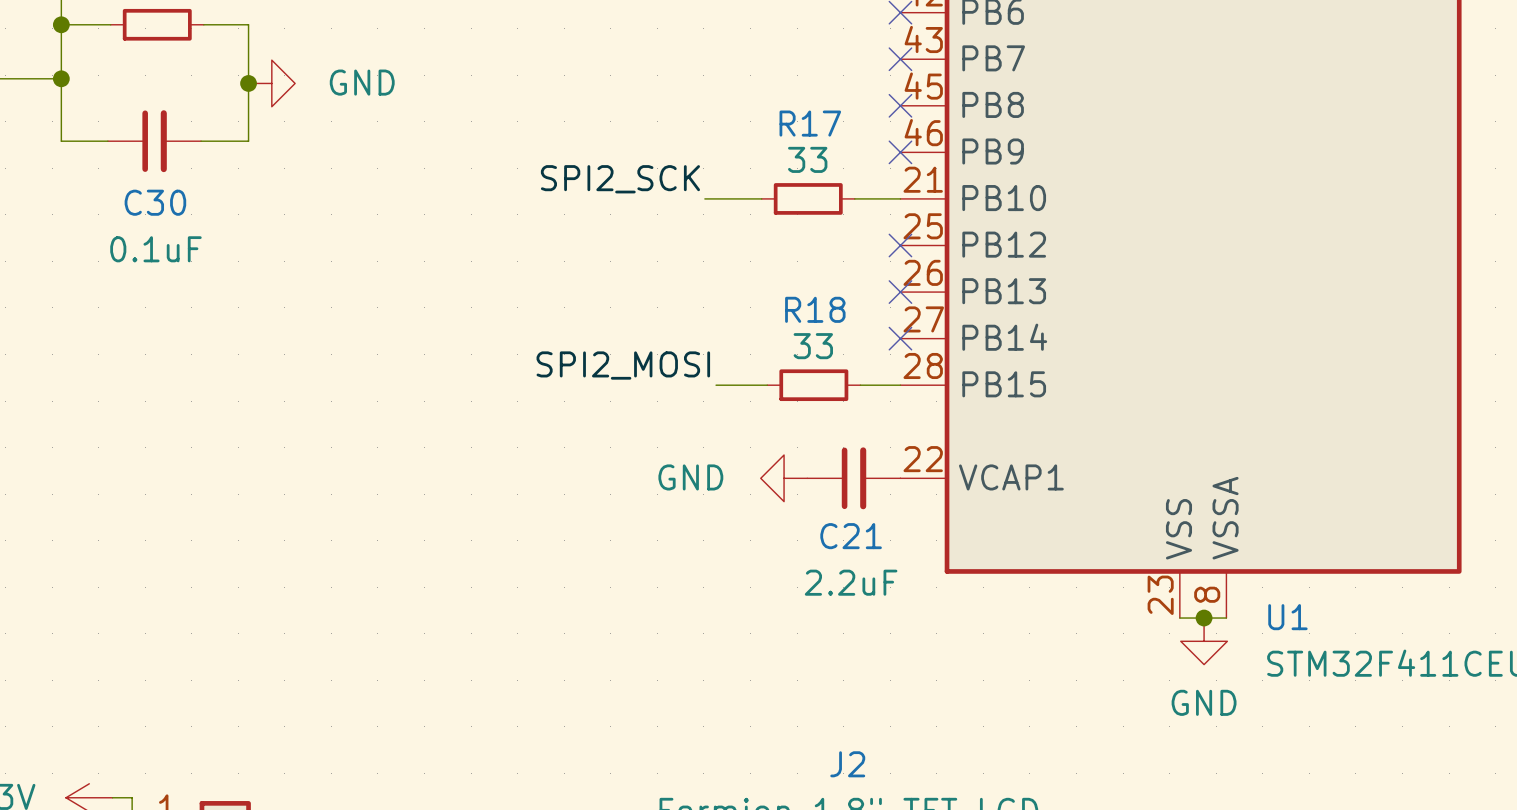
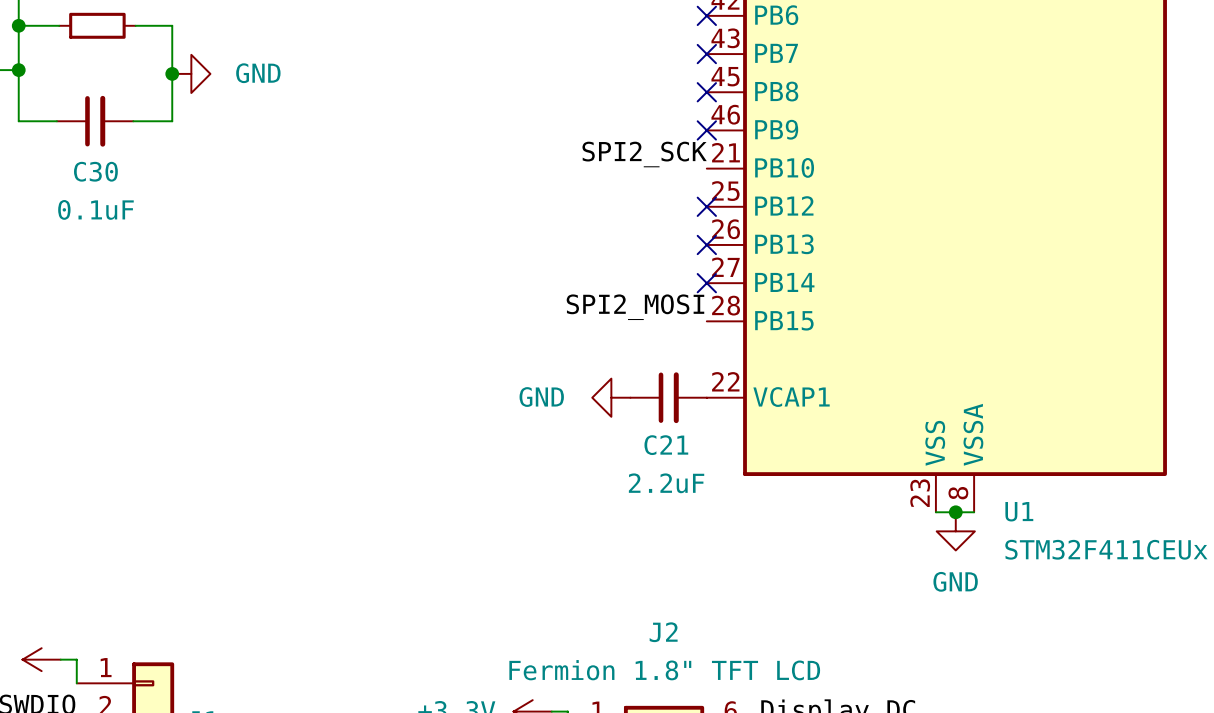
label position: SPI2_SCK (620, 179) -> SPI2_SCK (644, 154)
wire: (704, 198) (761, 198) -> none
R17: 33 (808, 198) -> none
wire: (854, 198) (900, 198) -> none
label position: SPI2_MOSI (623, 365) -> SPI2_MOSI (635, 307)
wire: (716, 385) (767, 385) -> none
R18: 33 (813, 385) -> none
wire: (860, 385) (900, 385) -> none

